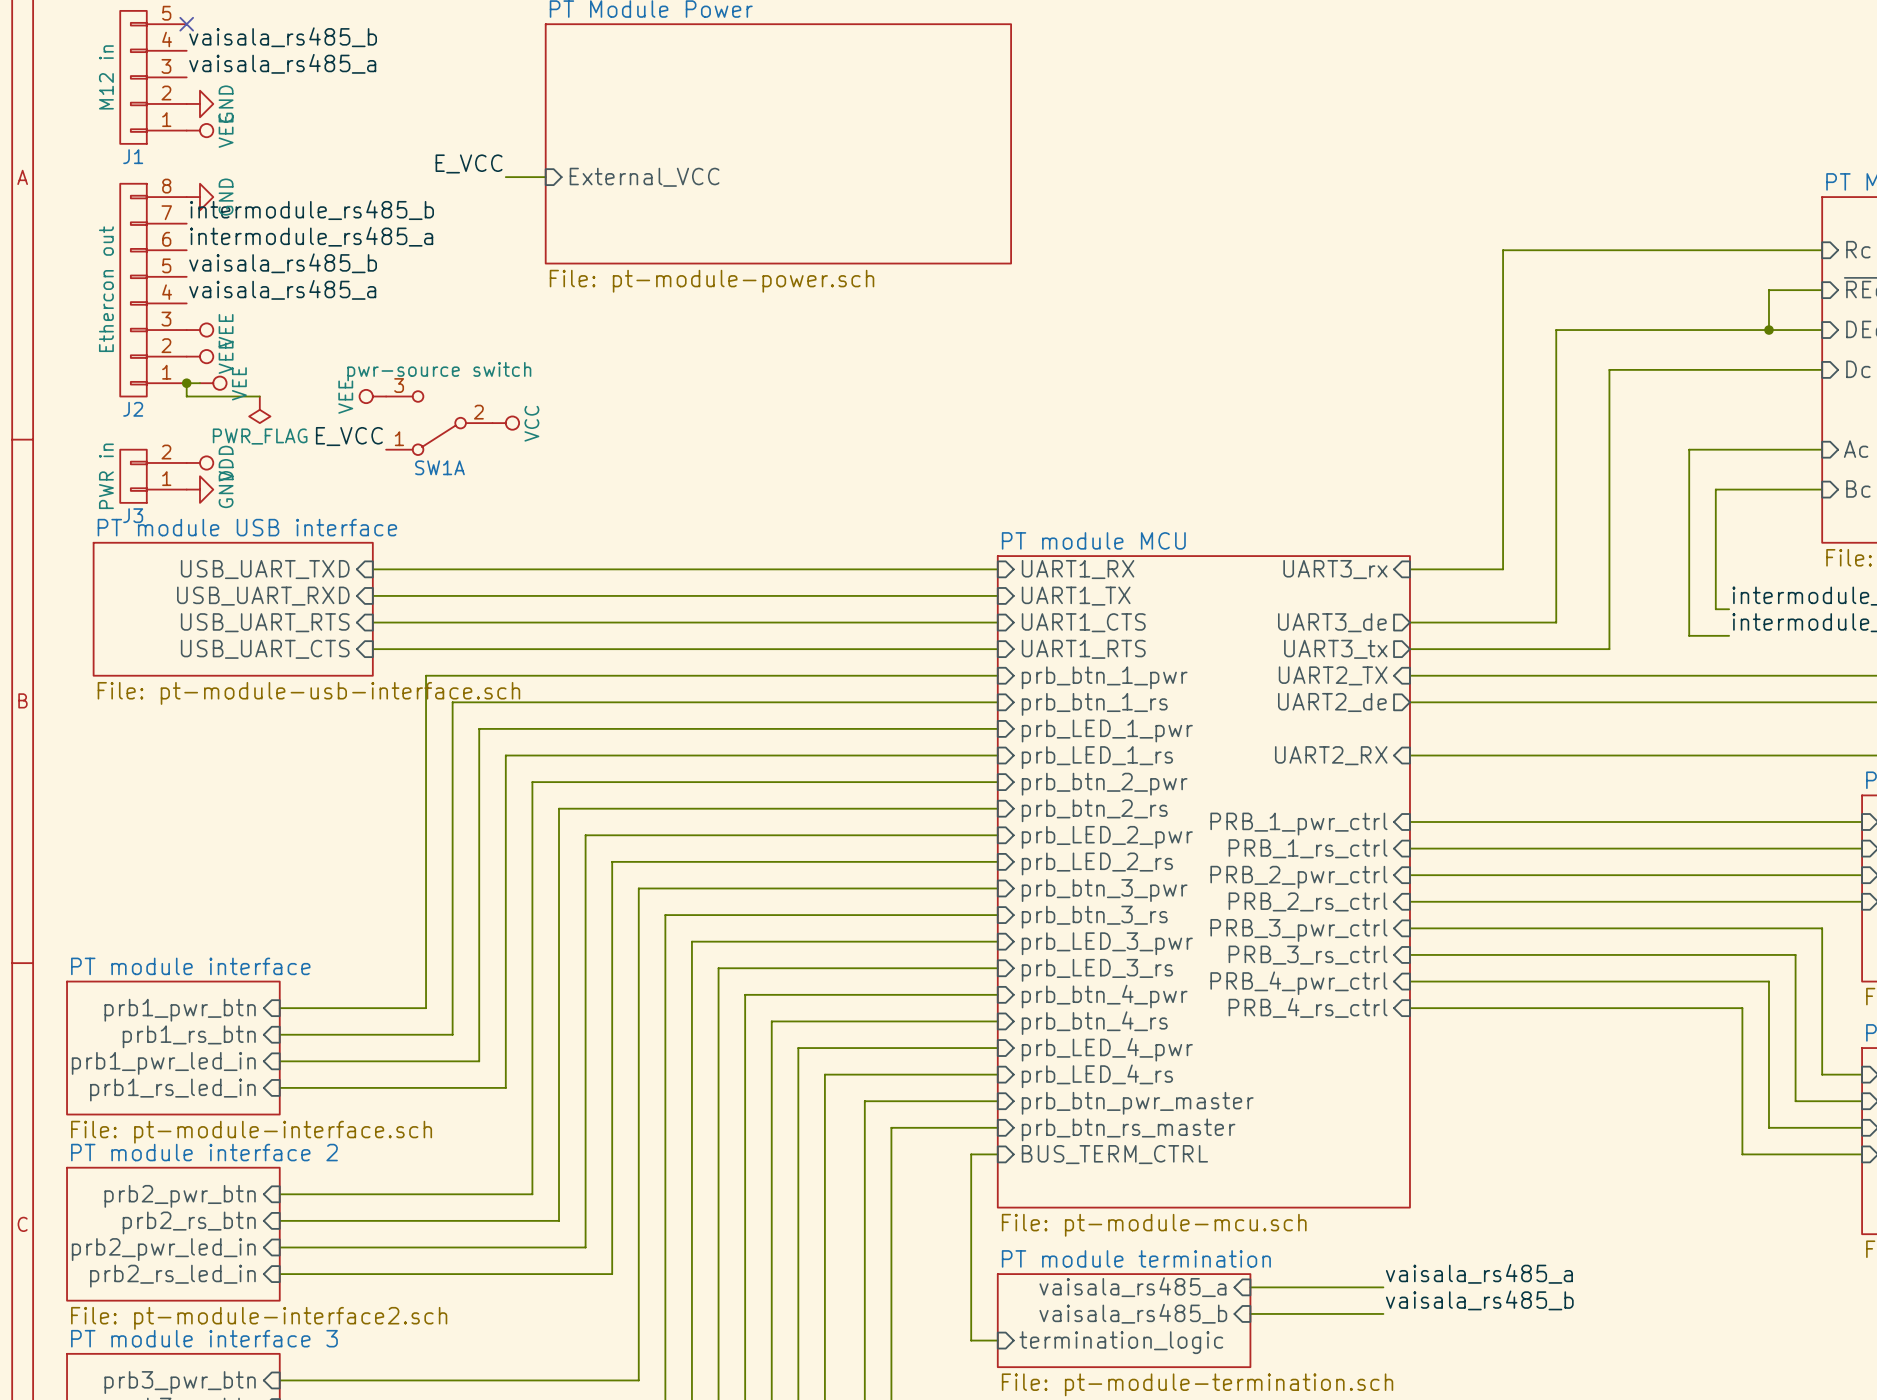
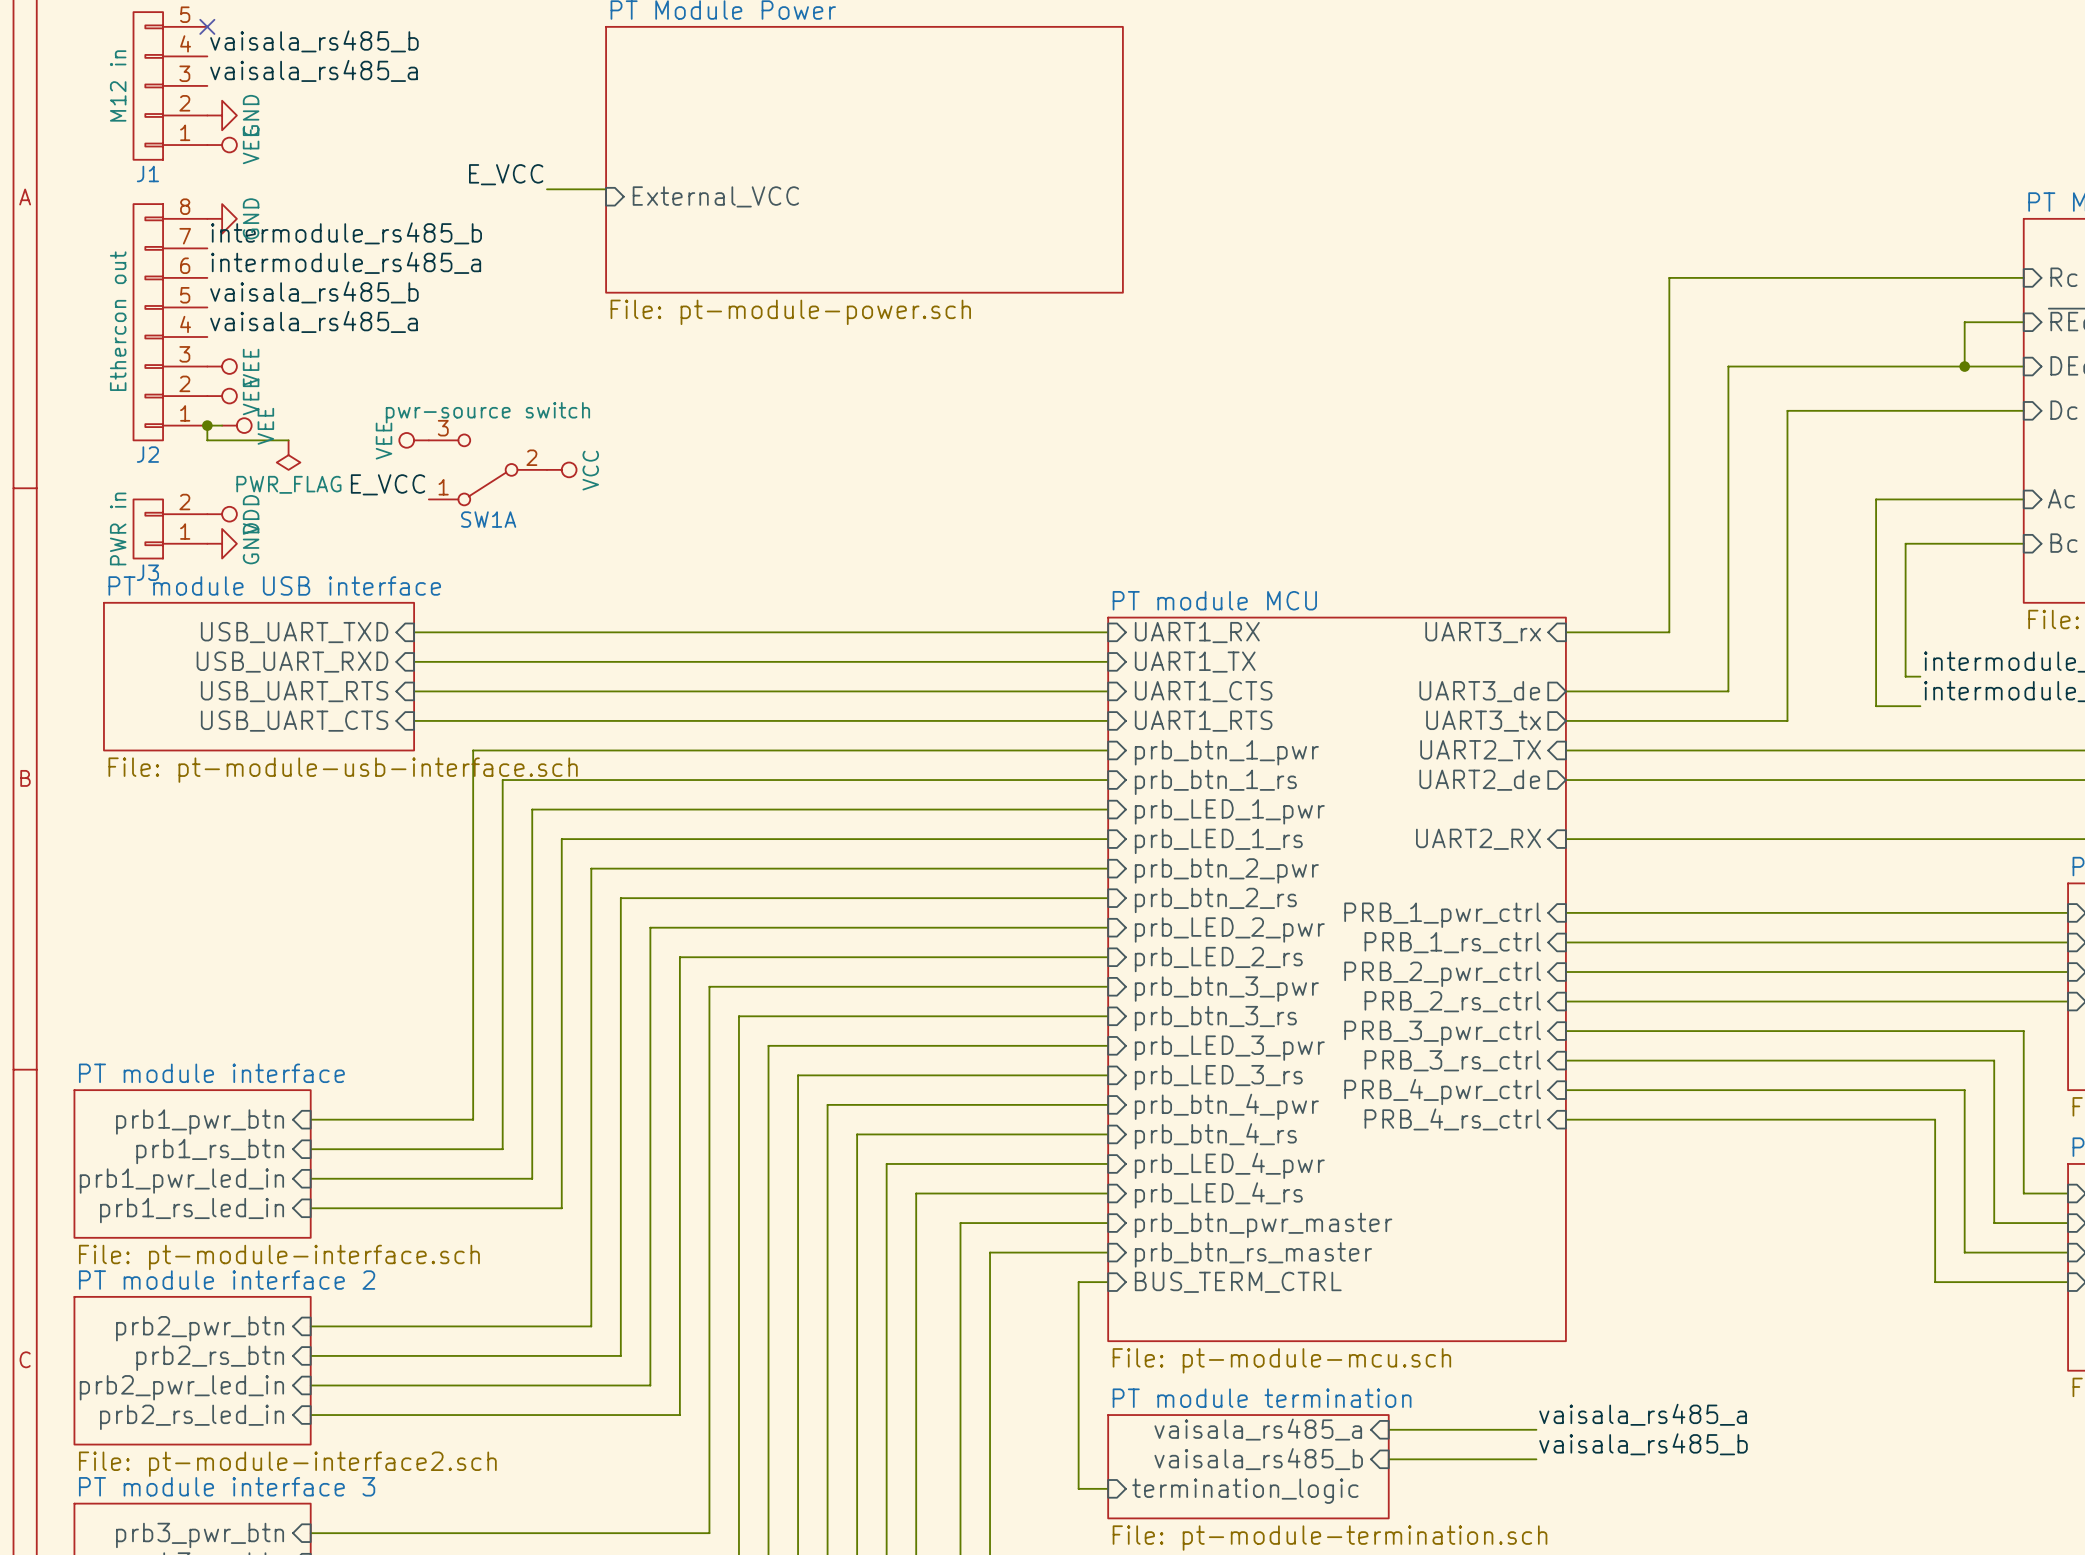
label position: E_VCC (469, 163) -> E_VCC (506, 174)
wire: none -> (547, 189) (606, 189)
wire: (505, 177) (545, 177) -> none

